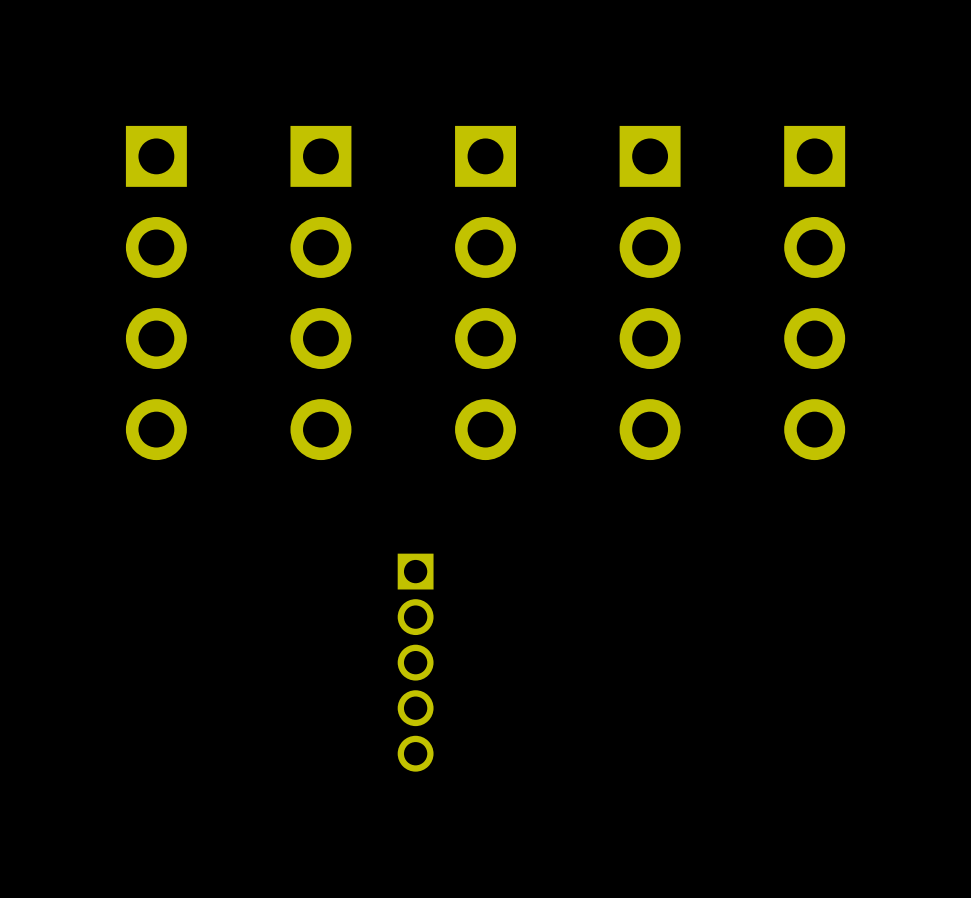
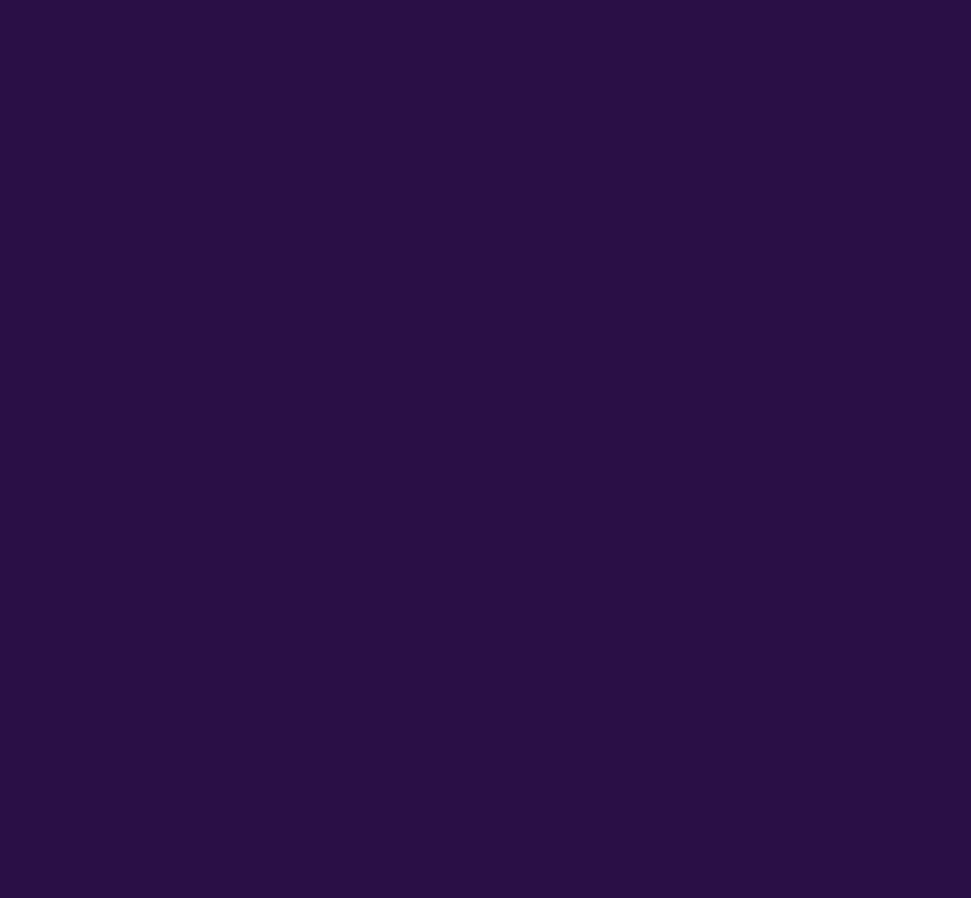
part: (156, 292) -> none
part: (320, 292) -> none
part: (485, 292) -> none
part: (650, 292) -> none
part: (814, 292) -> none
part: (415, 662) -> none

